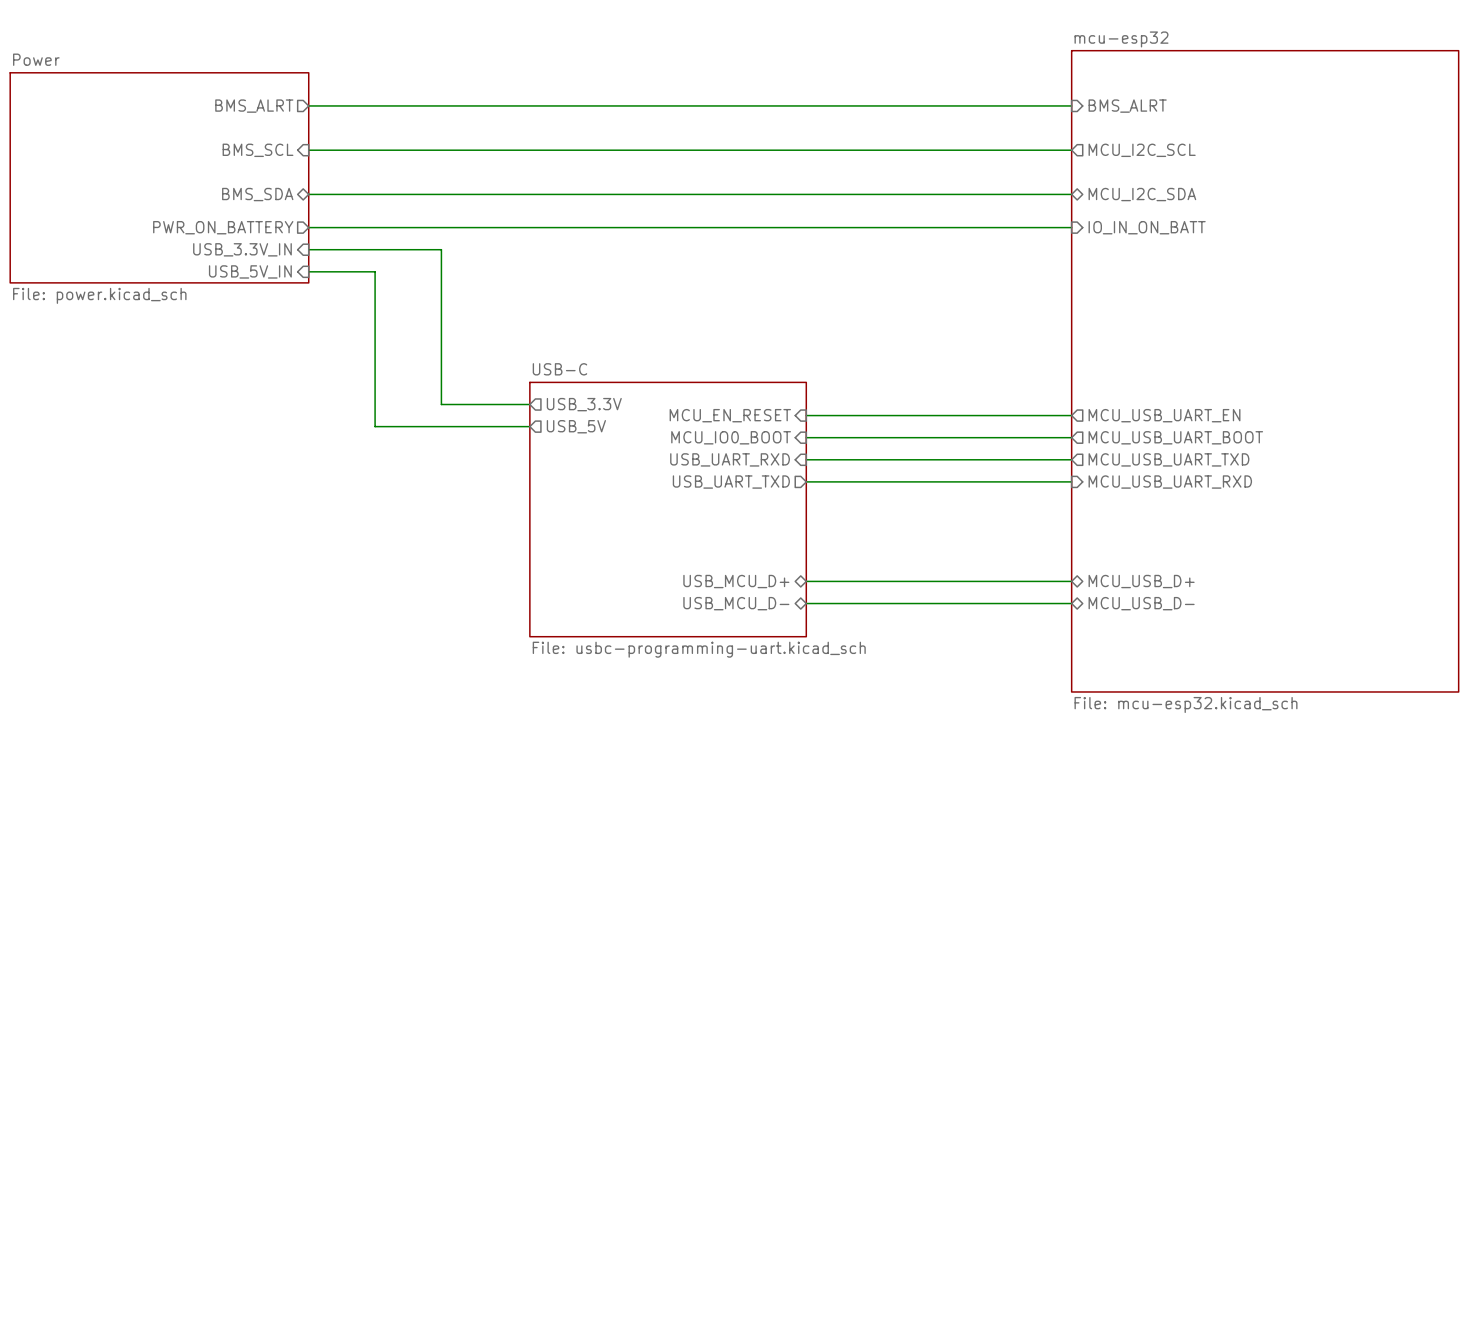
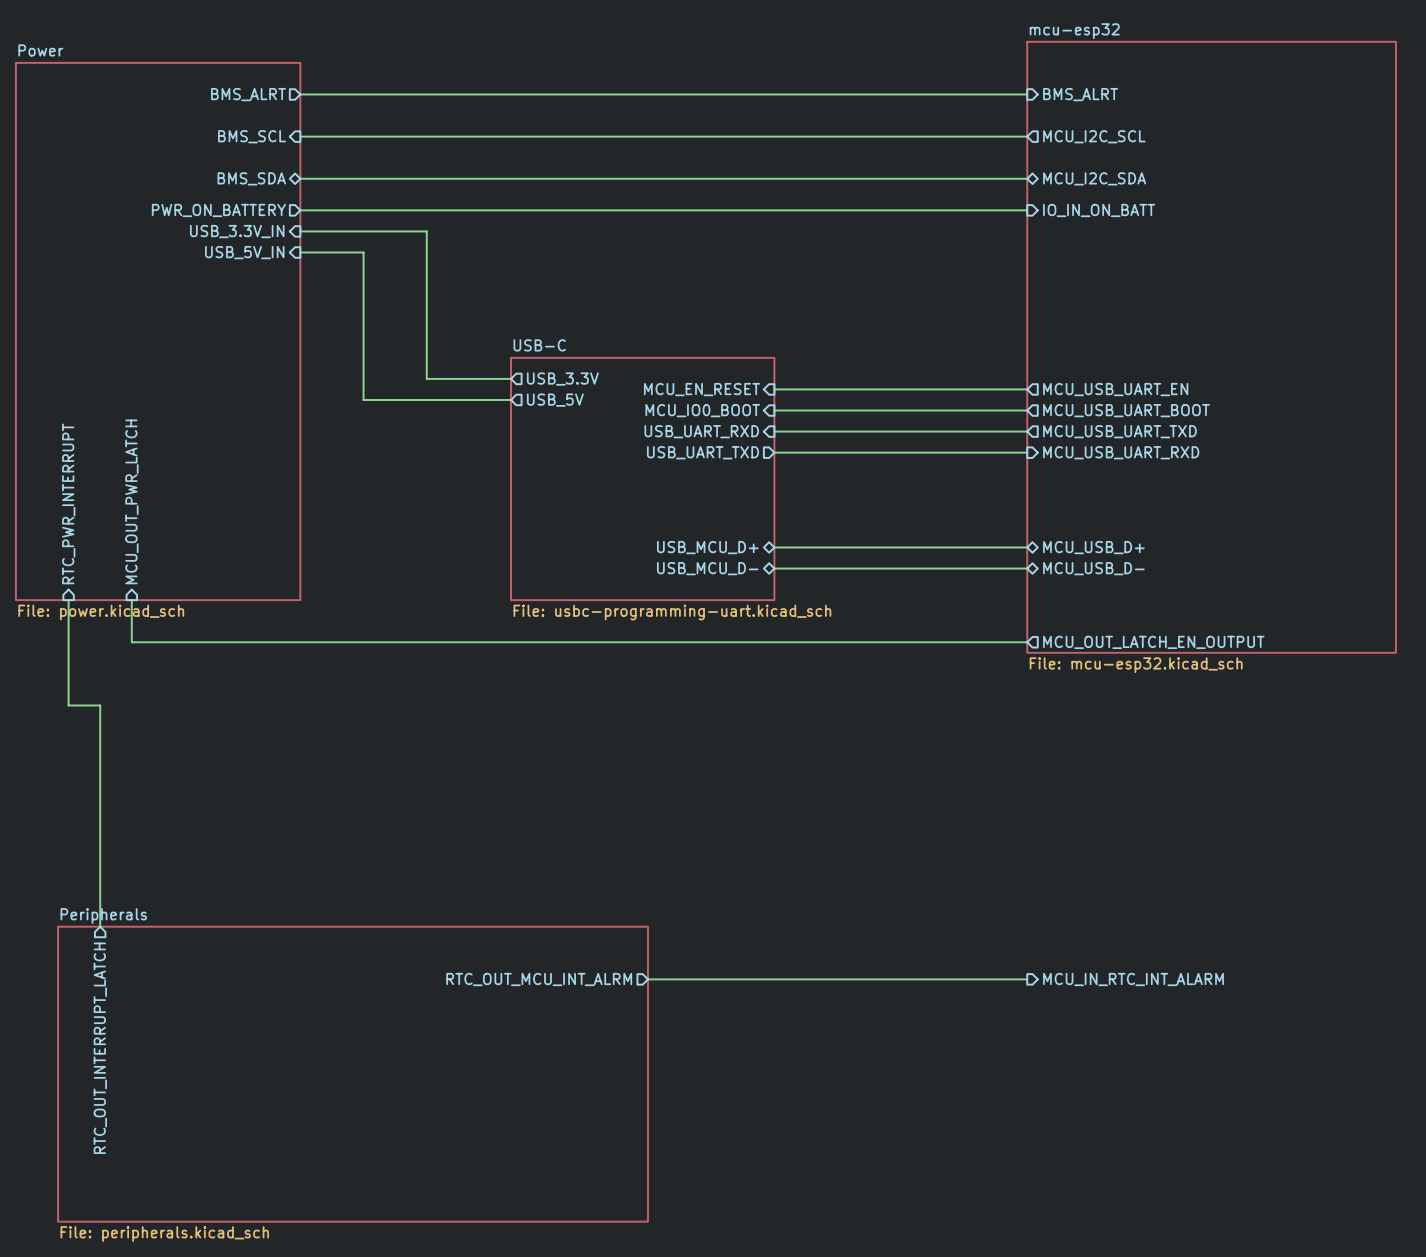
sheet Power: File: power.kicad_sch (159, 177) -> none
sheet Power: none -> File: power.kicad_sch (158, 331)
sheet pin: none -> MCU_OUT_PWR_LATCH (131, 501)
sheet pin: none -> RTC_PWR_INTERRUPT (68, 503)
wire: none -> (68, 600) (68, 705) (100, 705) (100, 926)
wire: none -> (131, 600) (131, 642) (1027, 642)
sheet pin: none -> MCU_OUT_LATCH_EN_OUTPUT (1153, 642)
sheet pin: none -> RTC_OUT_MCU_INT_ALRM (539, 979)
wire: none -> (647, 979) (1027, 979)
sheet pin: none -> MCU_IN_RTC_INT_ALARM (1133, 979)
sheet pin: none -> RTC_OUT_INTERRUPT_LATCH (100, 1048)
sheet Peripherals: none -> File: peripherals.kicad_sch (353, 1074)

